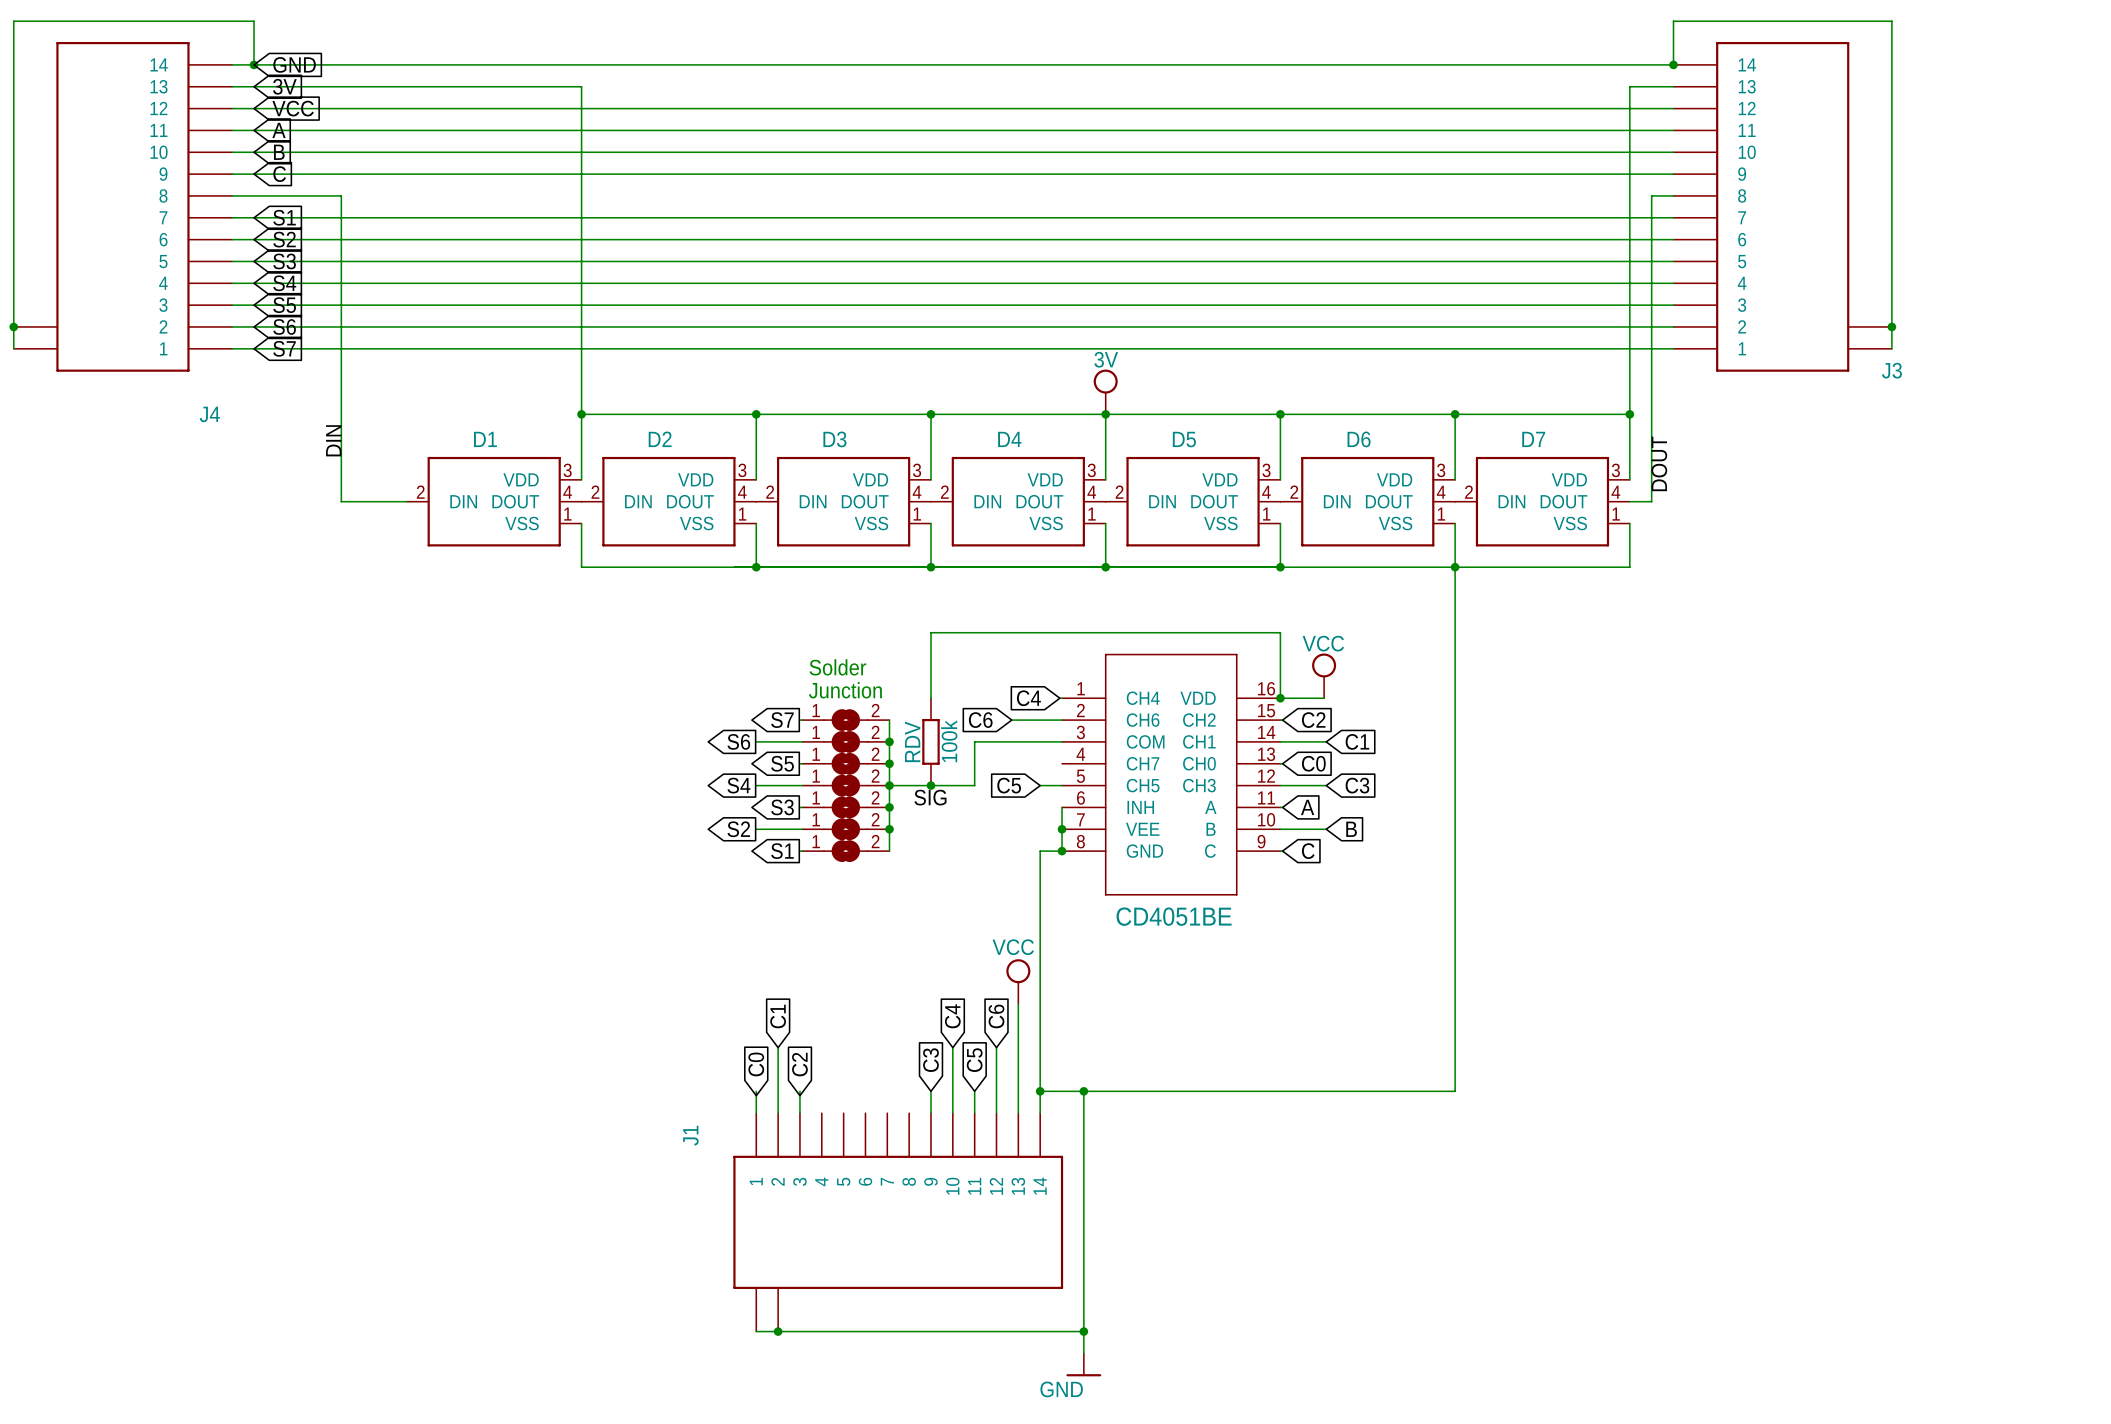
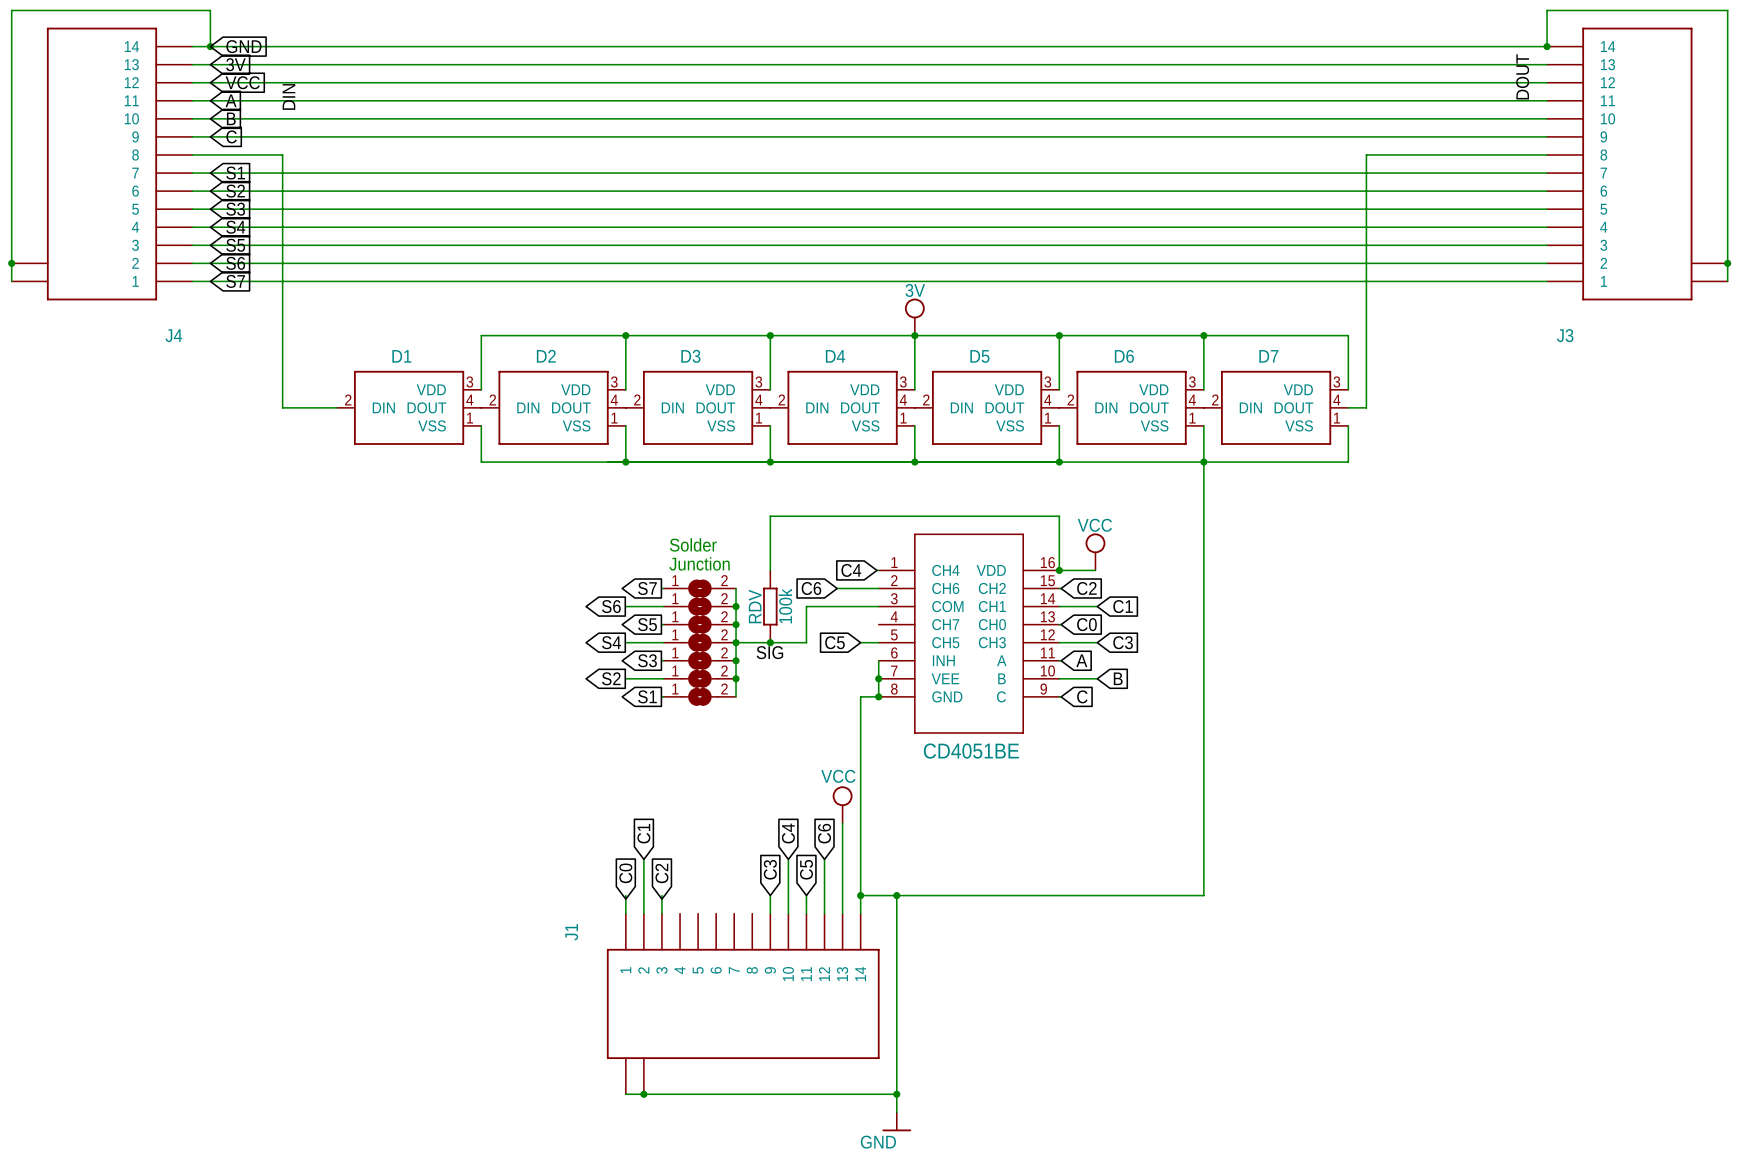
wire: (1870, 21) (1673, 21) (1673, 64) -> (1547, 10) (1547, 46) (1384, 46)
wire: (1891, 21) (1891, 348) -> (1565, 10) (1727, 10) (1727, 281)
junction: (1673, 64) -> none
junction: none -> (1547, 46)
wire: (581, 86) (581, 414) -> (481, 64) (1348, 64)
wire: (1629, 86) (1629, 414) -> none
wire: none -> (1384, 64) (1547, 64)
label: none -> DOUT (1522, 76)
wire: none -> (1384, 82) (1547, 82)
label: none -> DIN (288, 96)
wire: none -> (1384, 100) (1547, 100)
wire: none -> (1384, 118) (1547, 118)
wire: none -> (1384, 136) (1547, 136)
wire: none -> (1384, 154) (1547, 154)
J3 position: (1782, 206) -> (1637, 164)
wire: none -> (1384, 173) (1547, 173)
wire: none -> (1384, 191) (1547, 191)
wire: none -> (1384, 209) (1547, 209)
wire: none -> (1384, 227) (1547, 227)
wire: none -> (1384, 245) (1547, 245)
wire: none -> (1384, 263) (1547, 263)
junction: (1891, 326) -> none
junction: none -> (1727, 263)
wire: none -> (1384, 281) (1547, 281)
J3 name position: J3 (1891, 370) -> J3 (1565, 335)
junction: (581, 414) -> none
junction: (1629, 414) -> none
label: DIN (333, 440) -> none
label: DOUT (1659, 463) -> none

